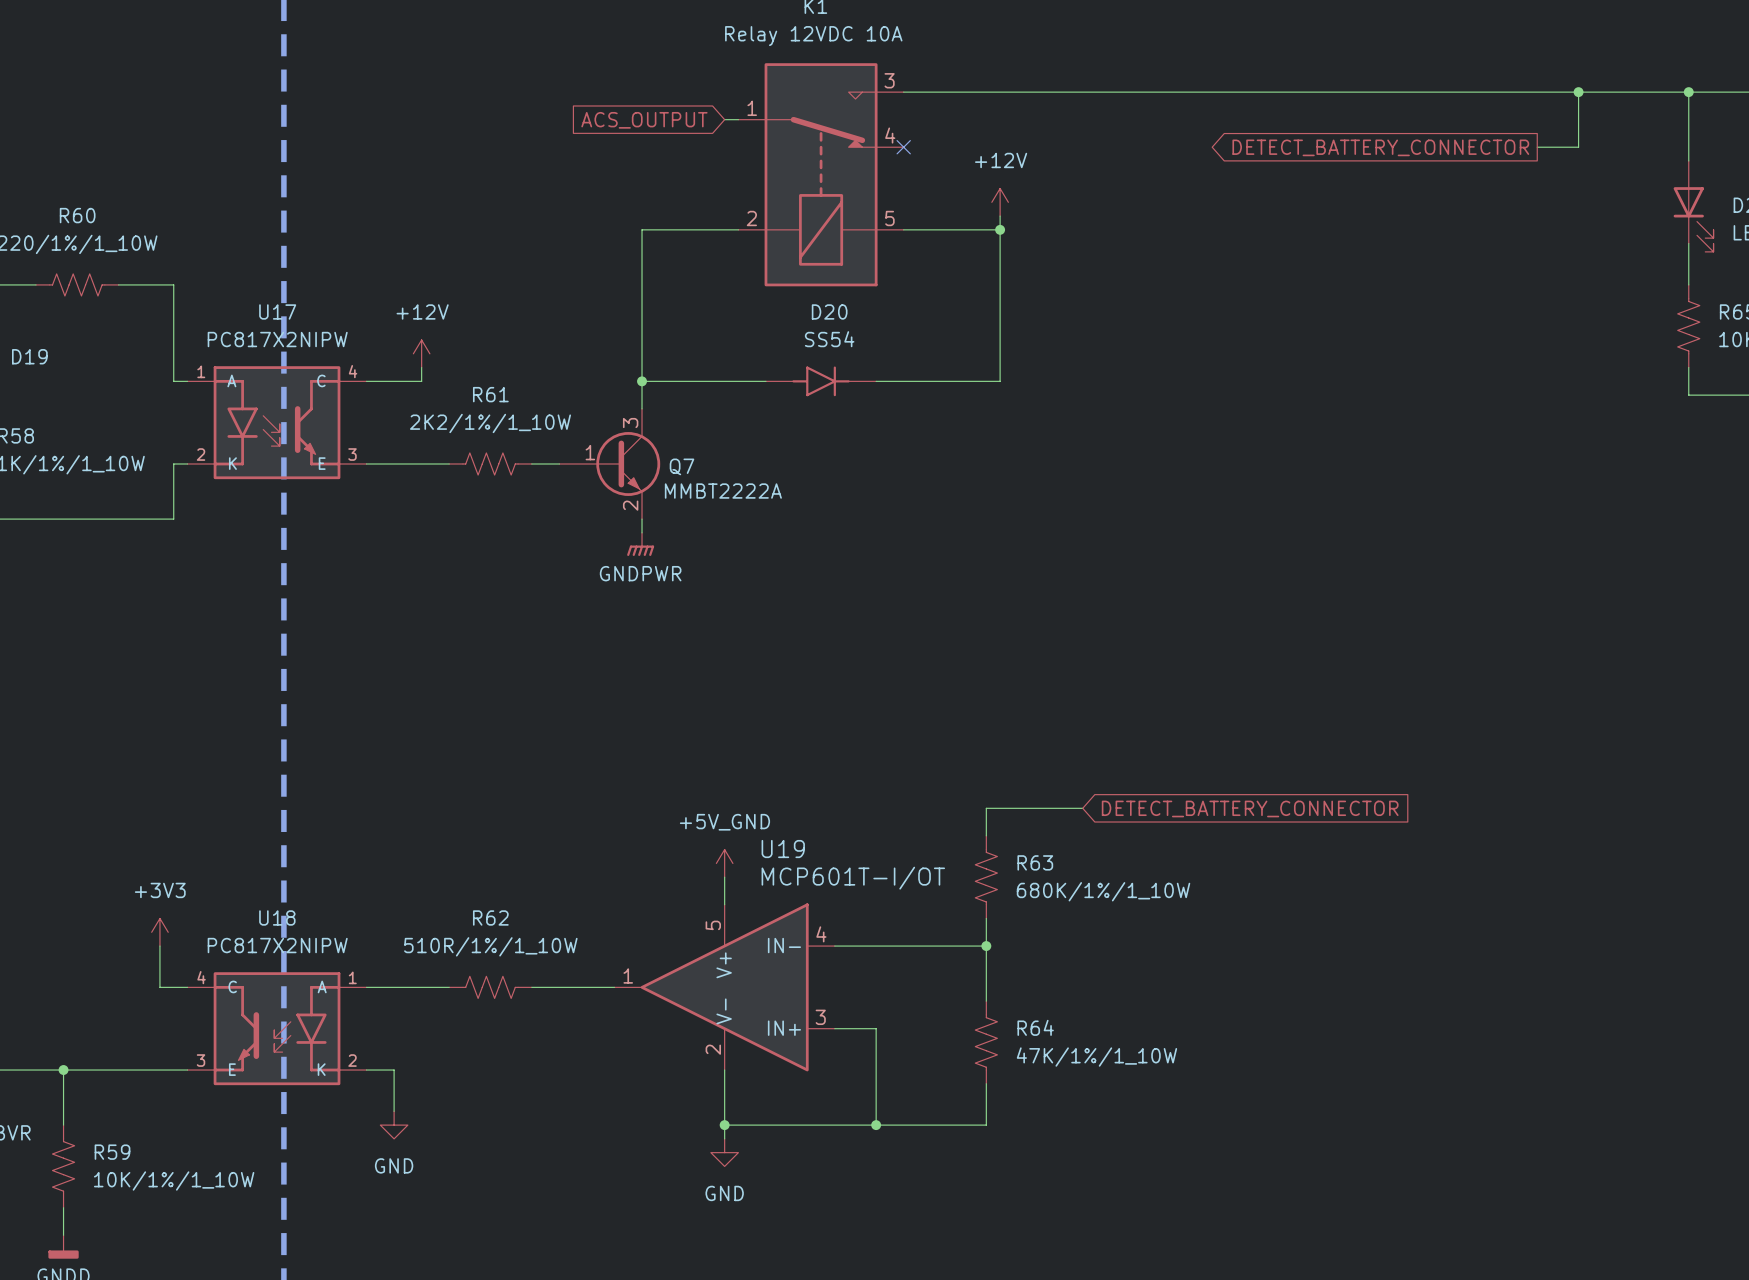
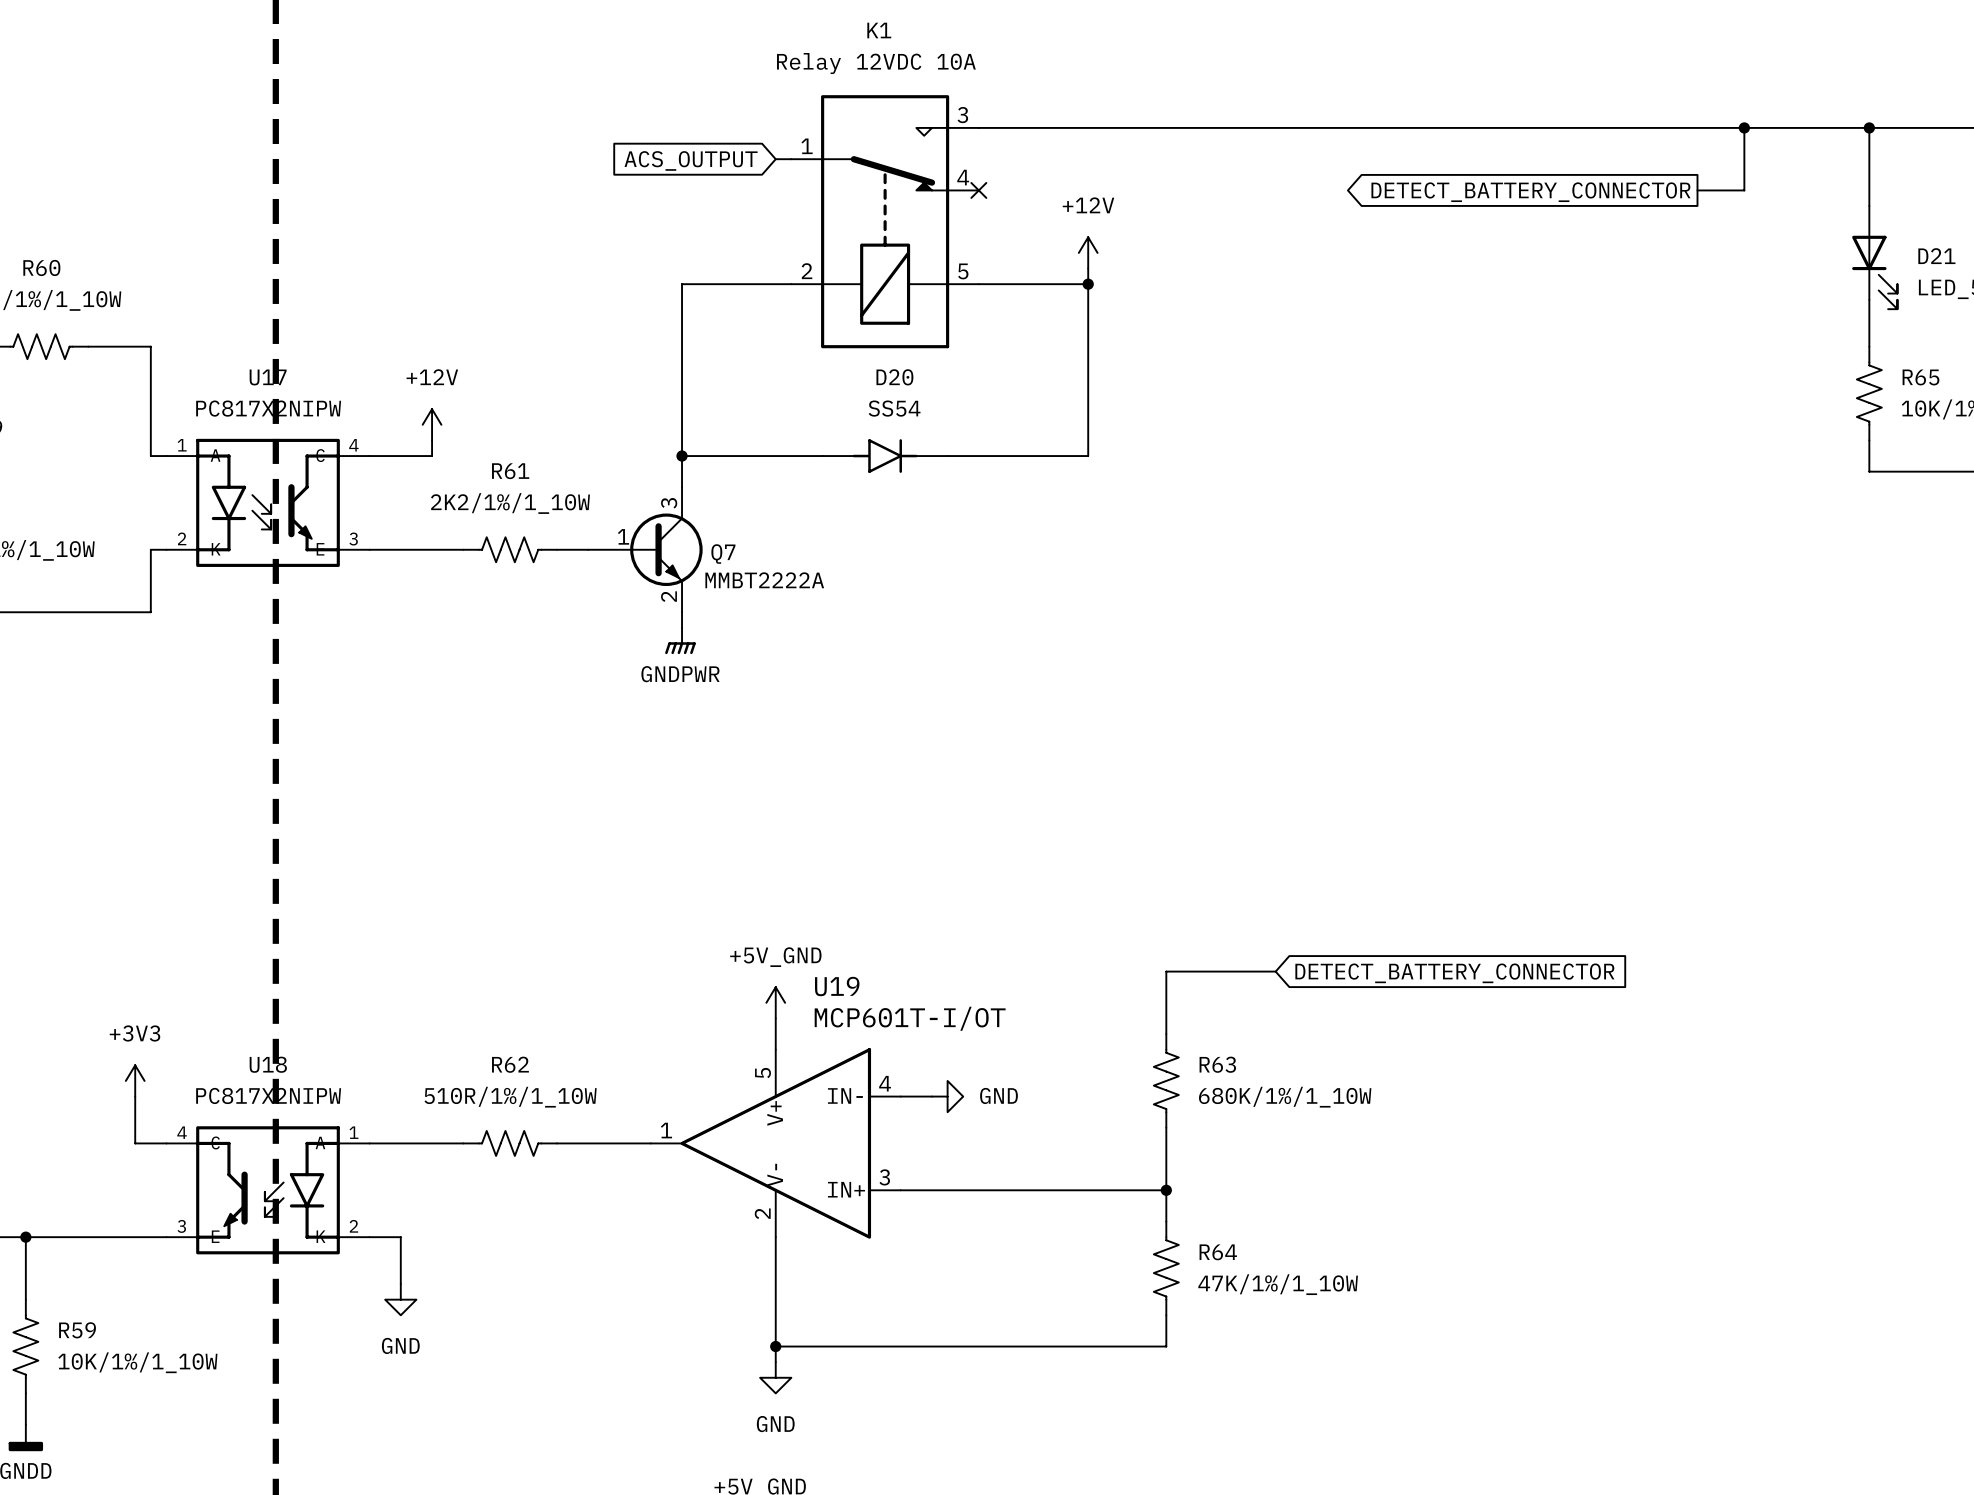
wire: (1082, 808) (986, 808) (986, 835) -> none
global label position: DETECT_BATTERY_CONNECTOR (1250, 808) -> DETECT_BATTERY_CONNECTOR (1454, 973)
wire: none -> (1275, 971) (1166, 971) (1166, 1034)
R63 position: (986, 877) -> (1166, 1080)
wire: (986, 918) (986, 1001) -> (1166, 1127) (1166, 1221)
wire: (862, 946) (986, 946) -> none
power symbol: none -> GND (947, 1096)
junction: (986, 946) -> none
wire: (876, 1028) (876, 1125) -> (947, 1190) (1166, 1190)
junction: none -> (1166, 1190)
R64 position: (986, 1042) -> (1166, 1268)
wire: (986, 1083) (986, 1125) (724, 1125) -> none
junction position: (724, 1125) -> (775, 1346)
junction: (876, 1125) -> none
wire: none -> (775, 1315) (775, 1362)
wire: none -> (1166, 1315) (1166, 1346) (775, 1346)
power symbol position: GND (724, 1152) -> GND (775, 1377)

